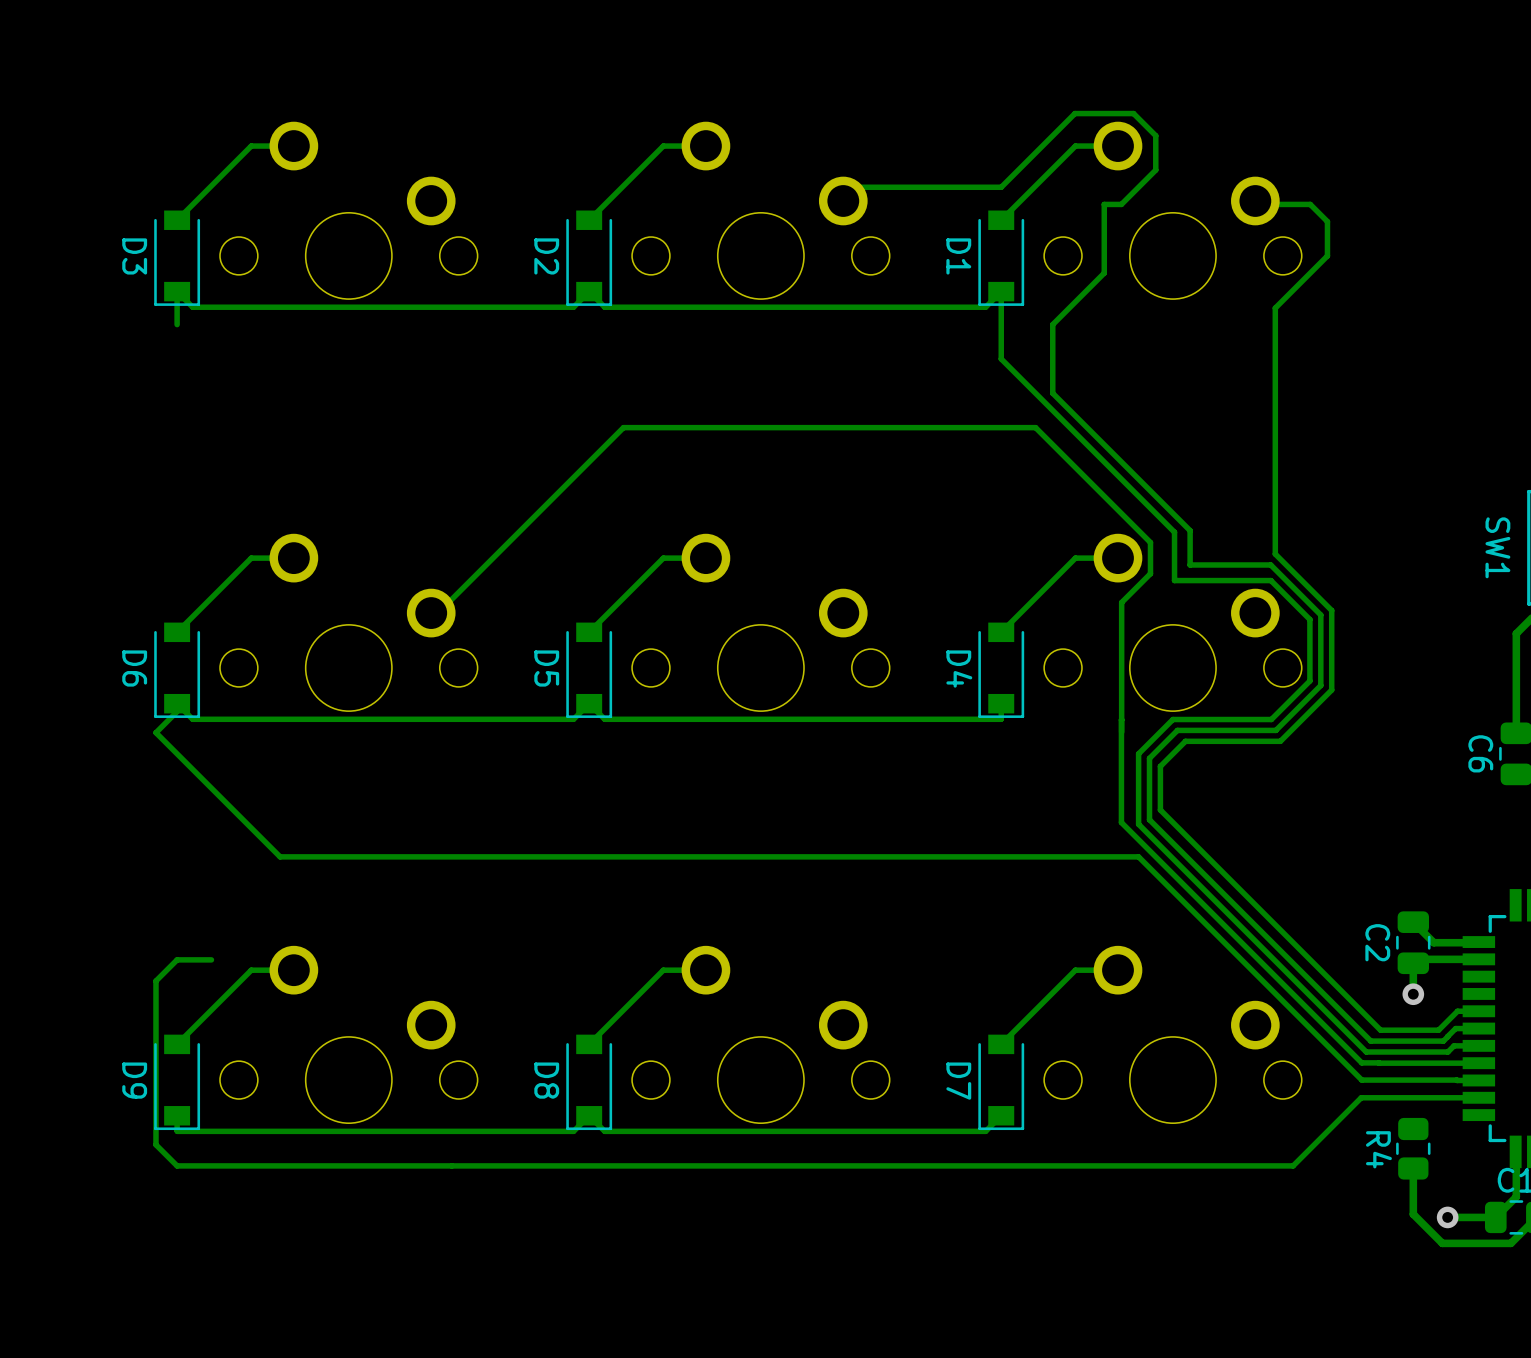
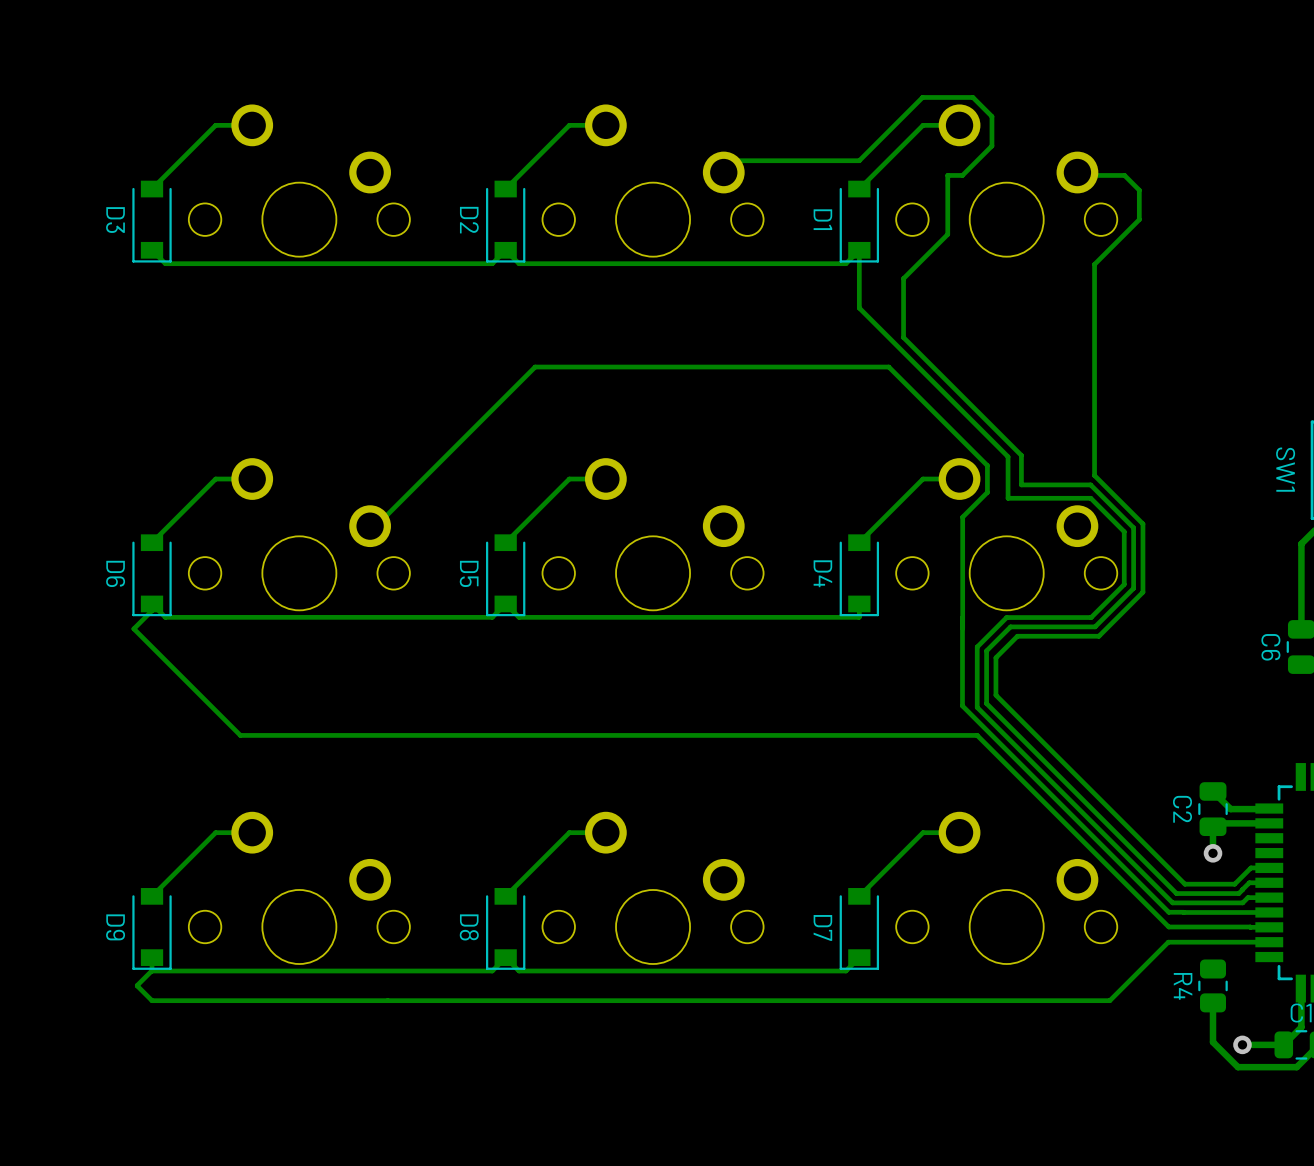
track: (177, 291) (177, 324) -> none
track: (211, 959) (177, 959) (155, 981) (155, 1144) (159, 1148) -> (152, 970) (137, 985)

